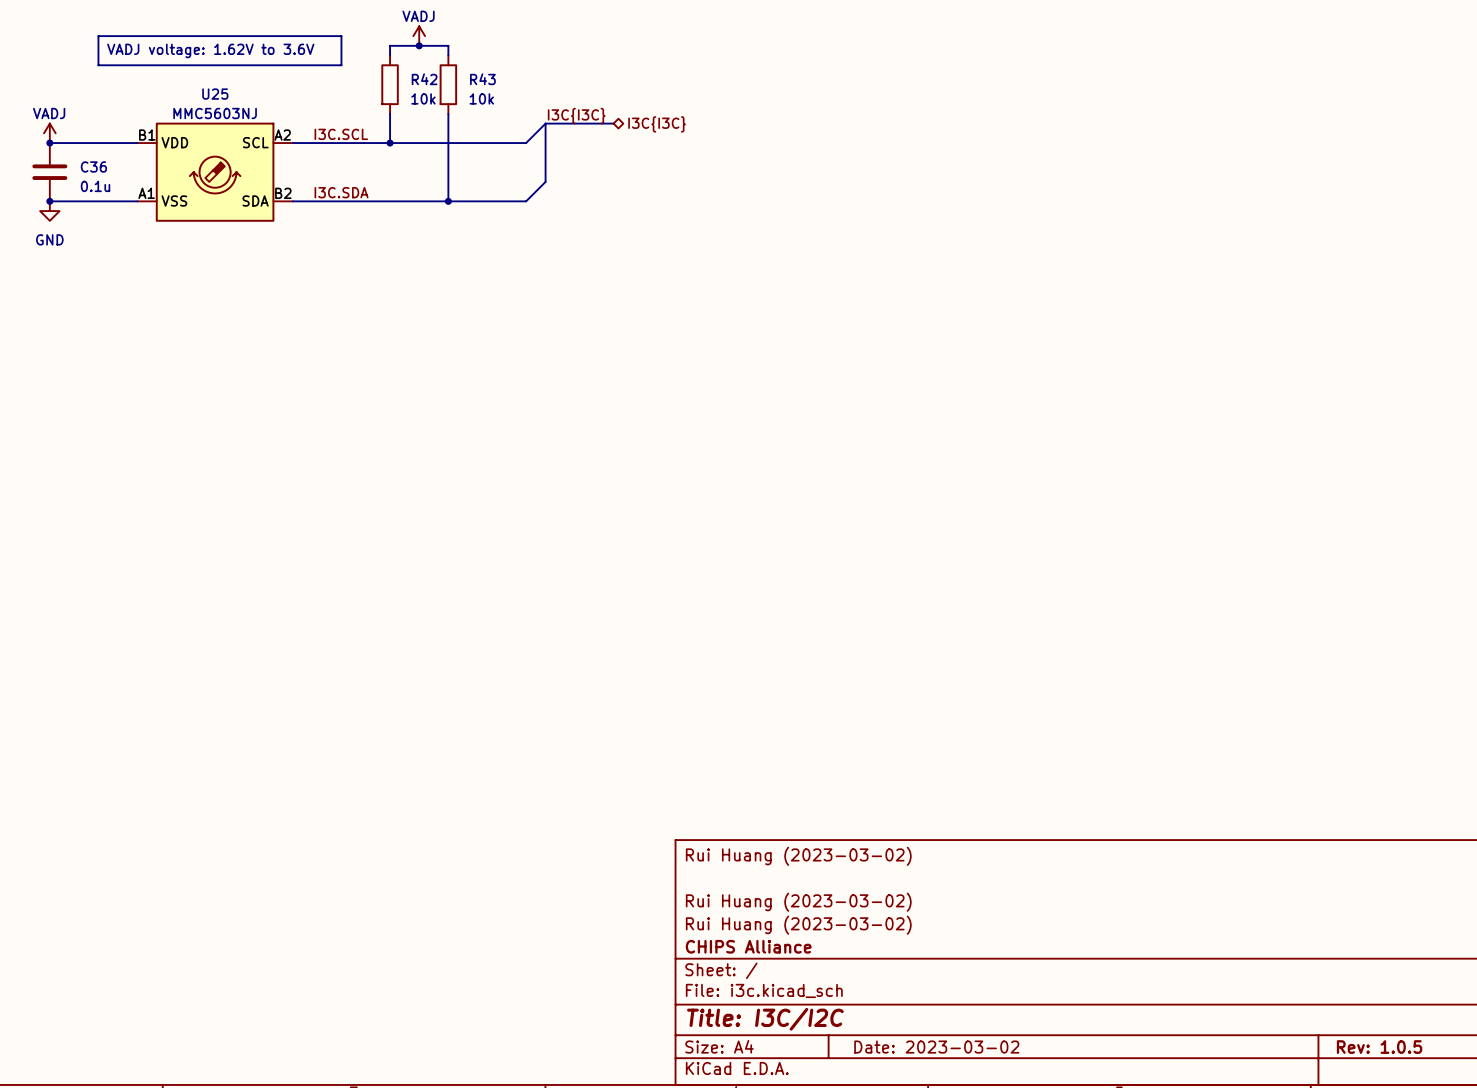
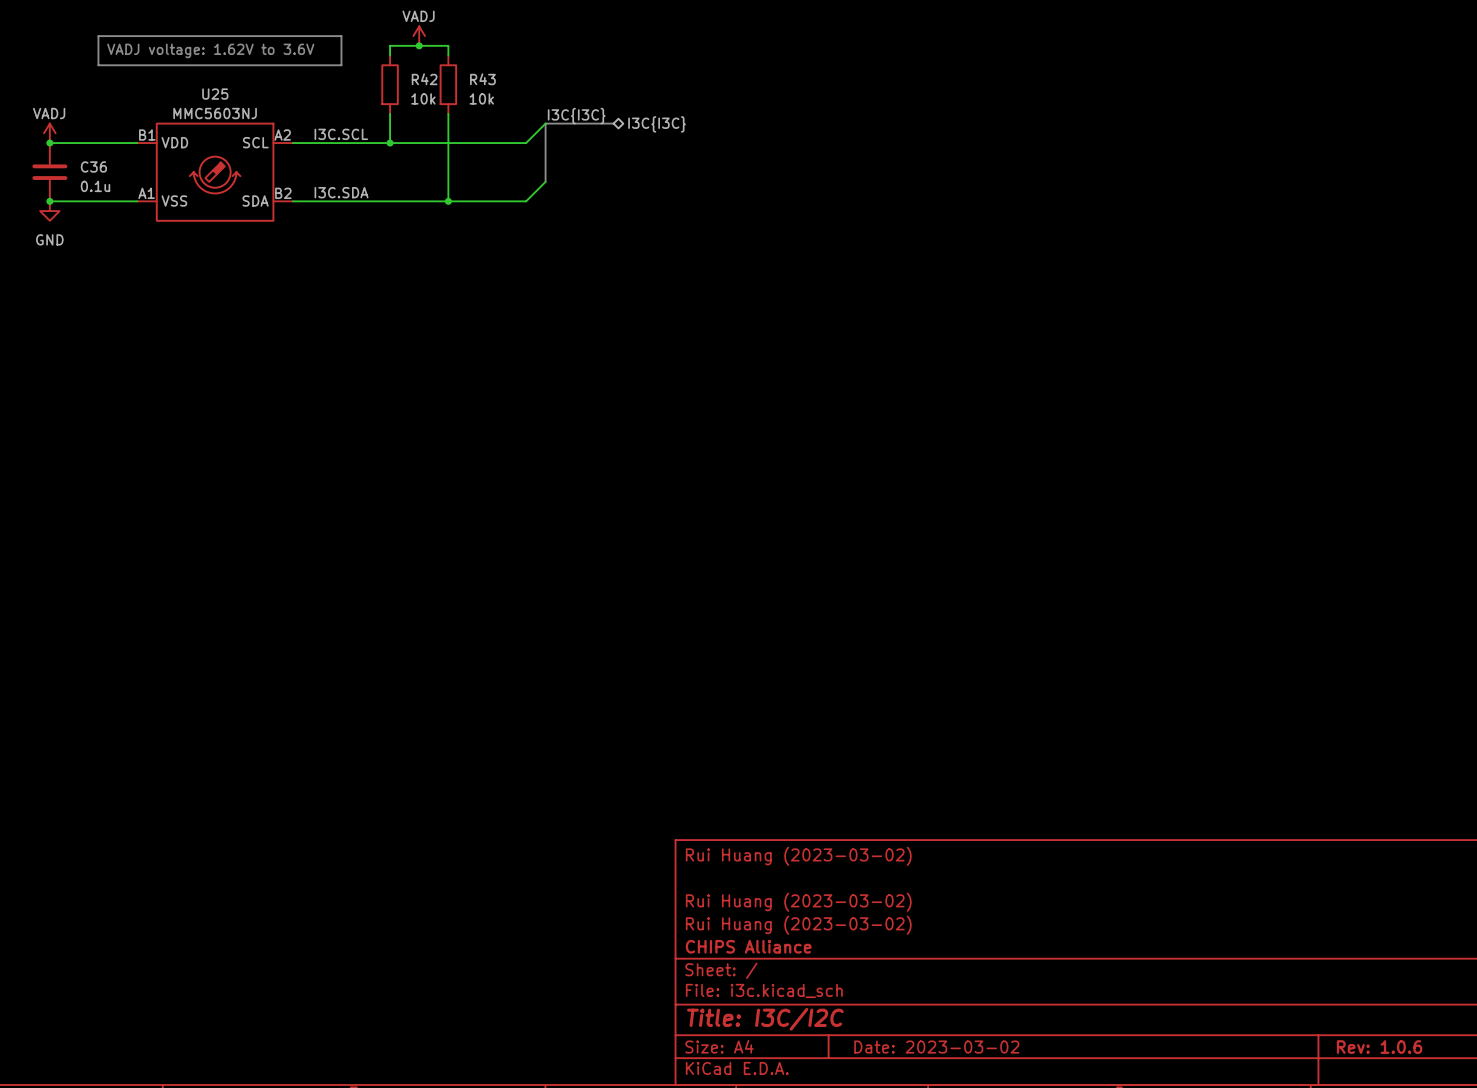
title block: Rev: 1.0.5 (1379, 1047) -> Rev: 1.0.6 (1379, 1047)

